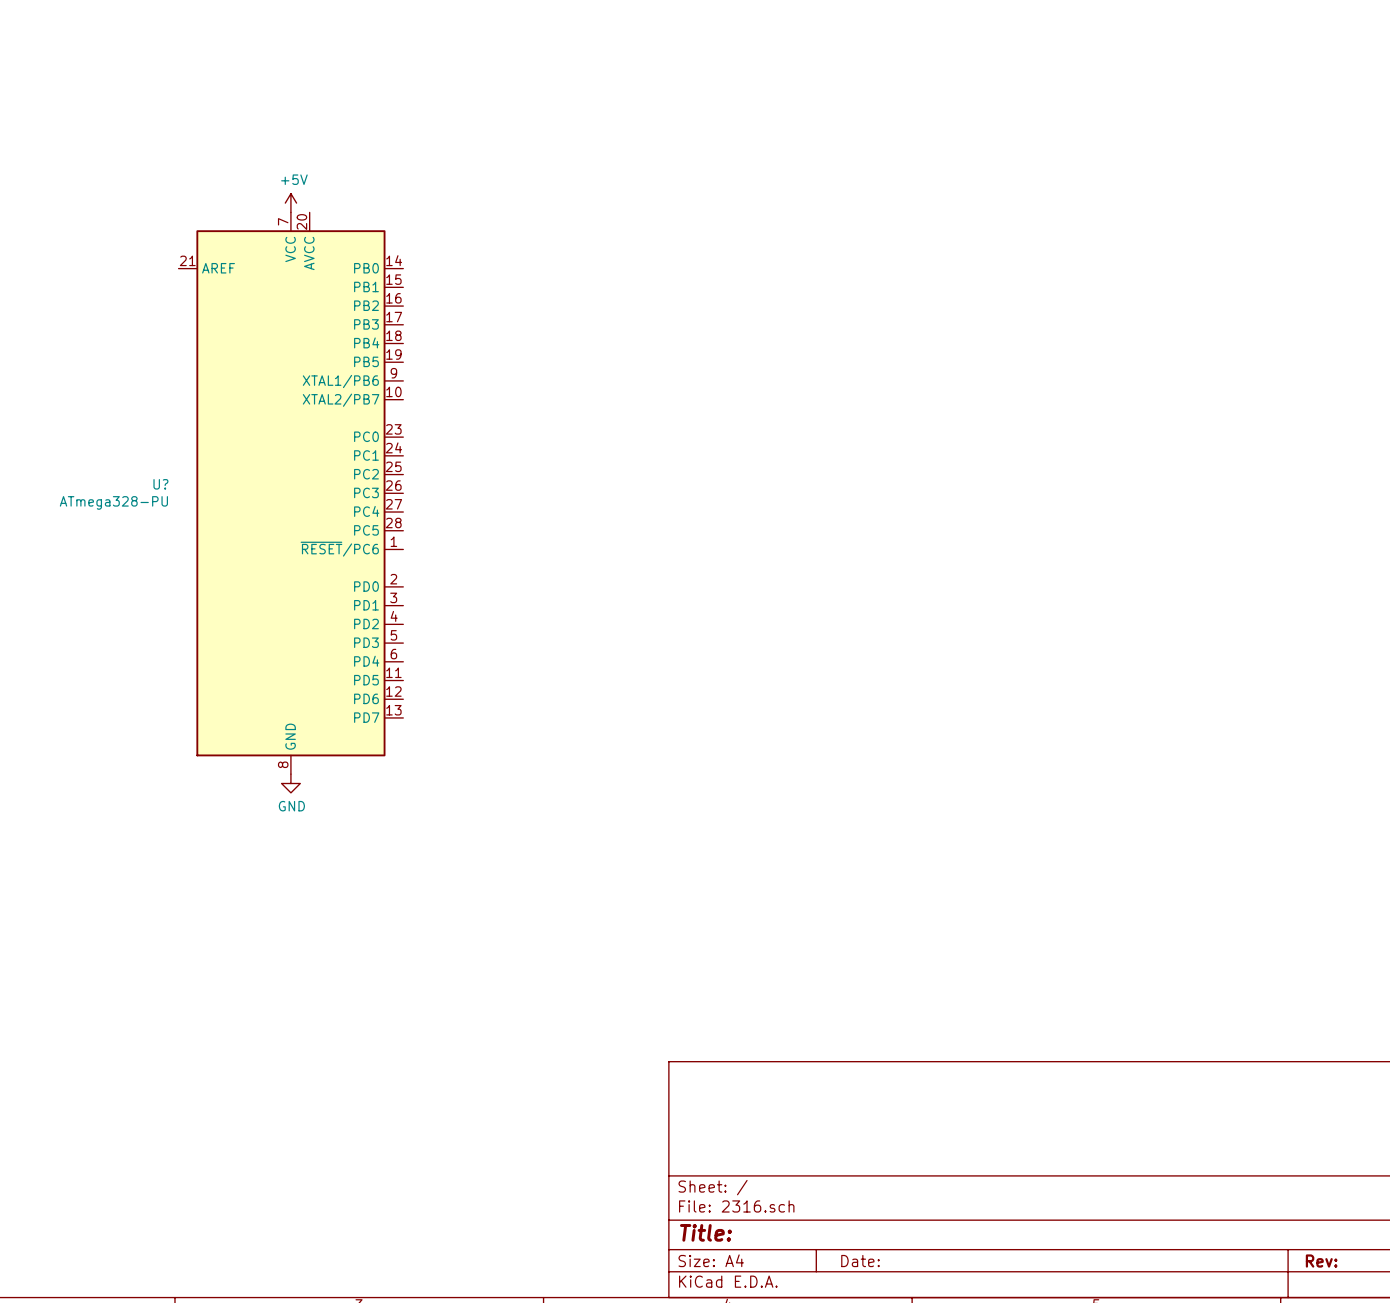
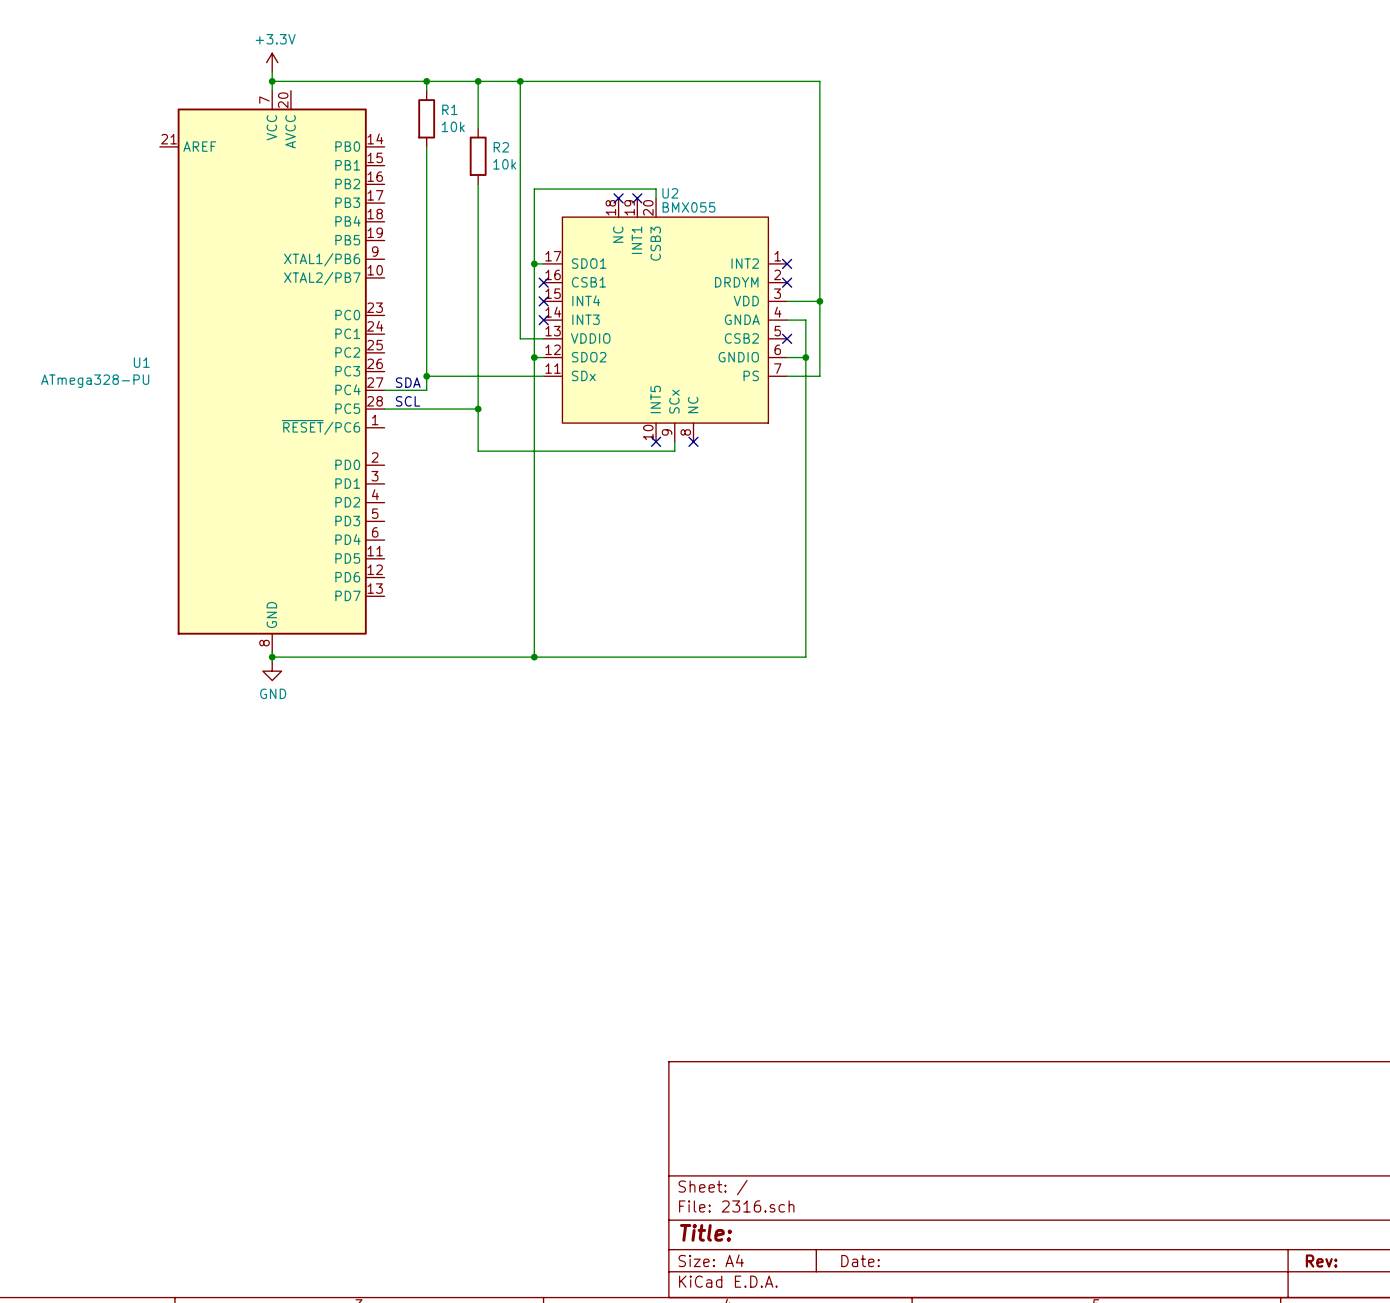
power symbol: none -> +3.3V (272, 62)
wire: none -> (272, 72) (272, 90)
wire: none -> (272, 81) (819, 81) (819, 376) (787, 376)
junction: none -> (272, 81)
wire: none -> (426, 81) (426, 90)
junction: none -> (426, 81)
wire: none -> (478, 81) (478, 128)
junction: none -> (478, 81)
wire: none -> (520, 81) (520, 338) (543, 338)
junction: none -> (520, 81)
R1: none -> 10k (426, 118)
wire: none -> (426, 146) (426, 390) (384, 390)
R2: none -> 10k (478, 156)
wire: none -> (478, 184) (478, 451) (674, 451) (674, 441)
no-connect mark: none -> (618, 198)
no-connect mark: none -> (637, 198)
wire: none -> (656, 198) (656, 189) (534, 189) (534, 657)
power symbol: +5V (290, 203) -> none
wire: none -> (534, 263) (543, 263)
junction: none -> (534, 263)
no-connect mark: none -> (787, 263)
no-connect mark: none -> (543, 282)
no-connect mark: none -> (787, 282)
no-connect mark: none -> (543, 301)
wire: none -> (787, 301) (819, 301)
junction: none -> (819, 301)
no-connect mark: none -> (543, 320)
U2: none -> BMX055 (665, 320)
wire: none -> (787, 320) (805, 320) (805, 657) (272, 657)
no-connect mark: none -> (787, 338)
wire: none -> (534, 357) (543, 357)
junction: none -> (534, 357)
wire: none -> (787, 357) (805, 357)
junction: none -> (805, 357)
U1: none -> ATmega328-PU (272, 371)
wire: none -> (426, 376) (543, 376)
junction: none -> (426, 376)
text: none -> SDA (408, 382)
text: none -> SCL (408, 401)
wire: none -> (384, 409) (478, 409)
junction: none -> (478, 409)
no-connect mark: none -> (656, 441)
no-connect mark: none -> (693, 441)
U?: ATmega328-PU (290, 493) -> none
junction: none -> (272, 657)
junction: none -> (534, 657)
power symbol position: GND (290, 783) -> GND (272, 671)

